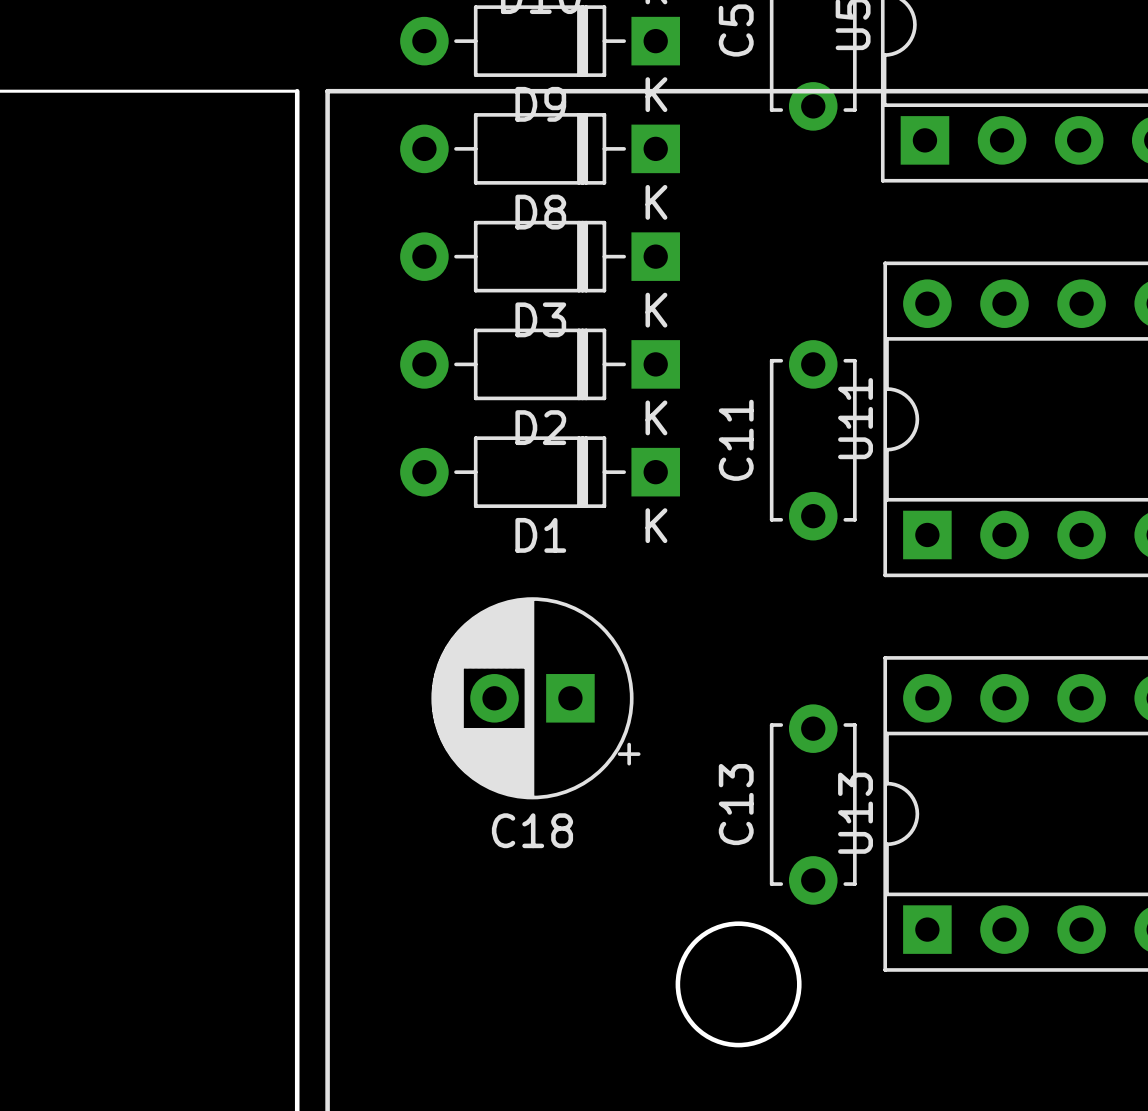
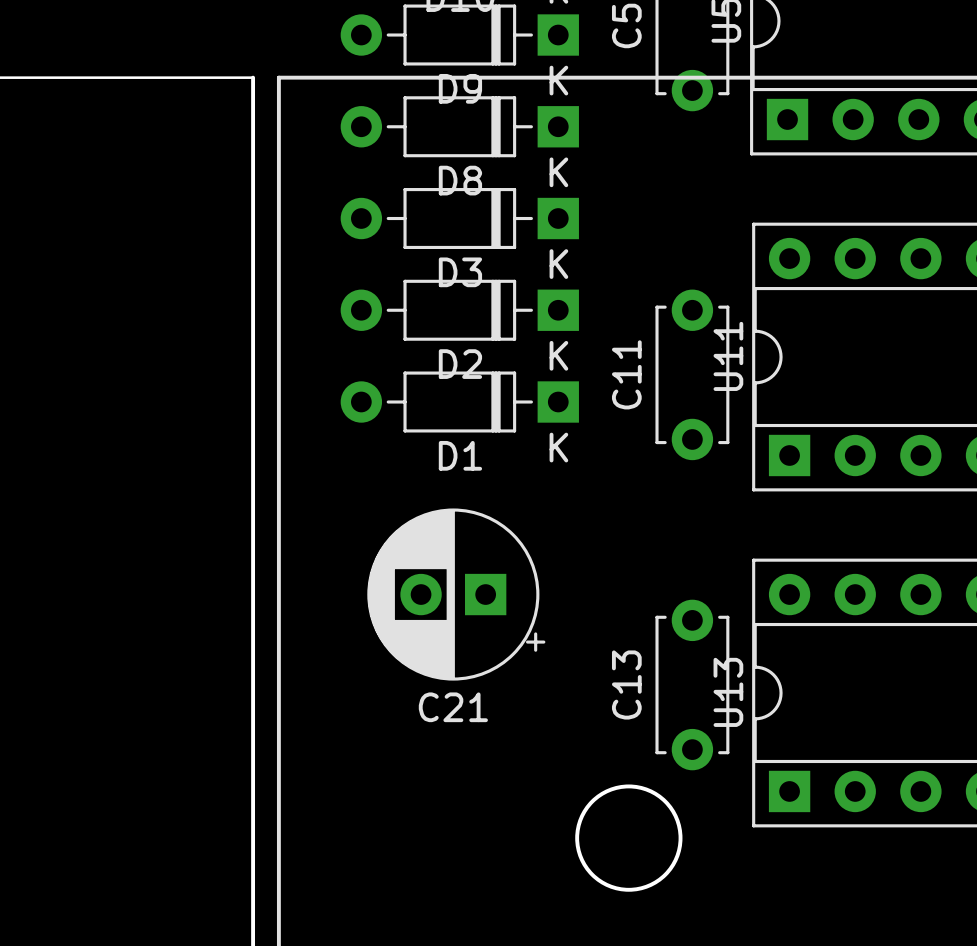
C18 name: C18 (532, 830) -> C21 (453, 707)

